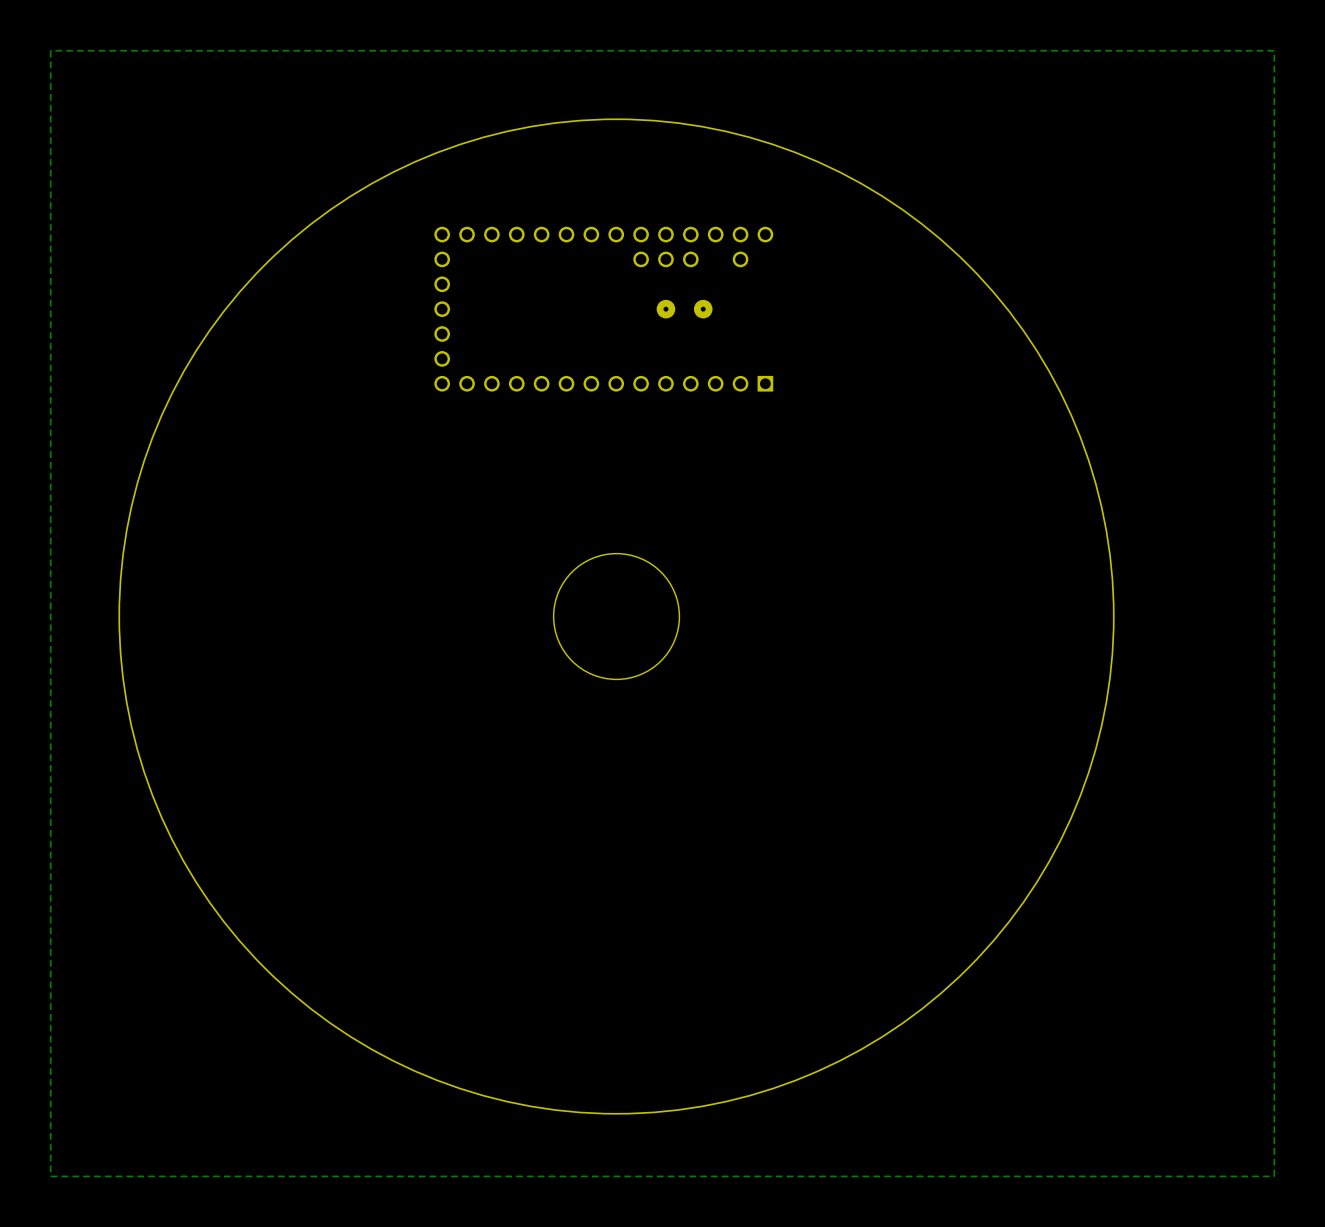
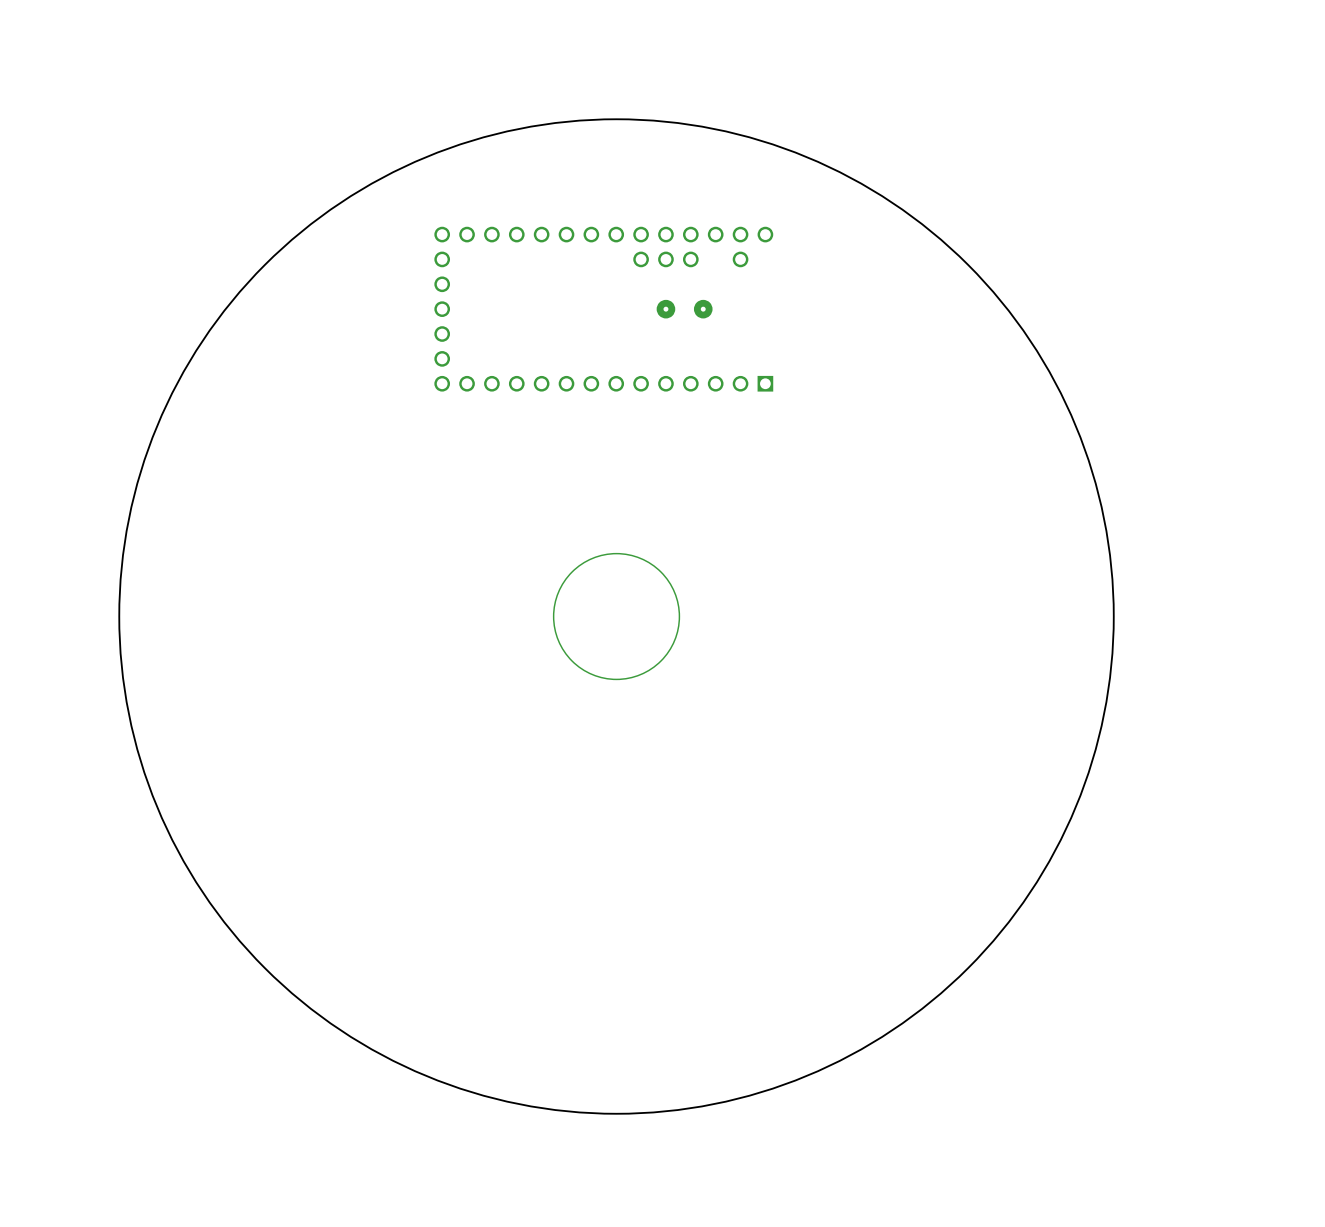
zone outline: (1274, 50) (1274, 1176) (50, 1176) (50, 50) (1274, 50) -> none

